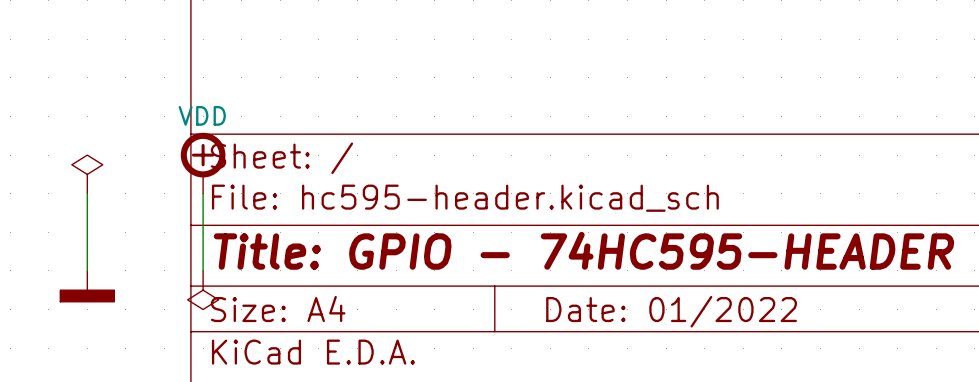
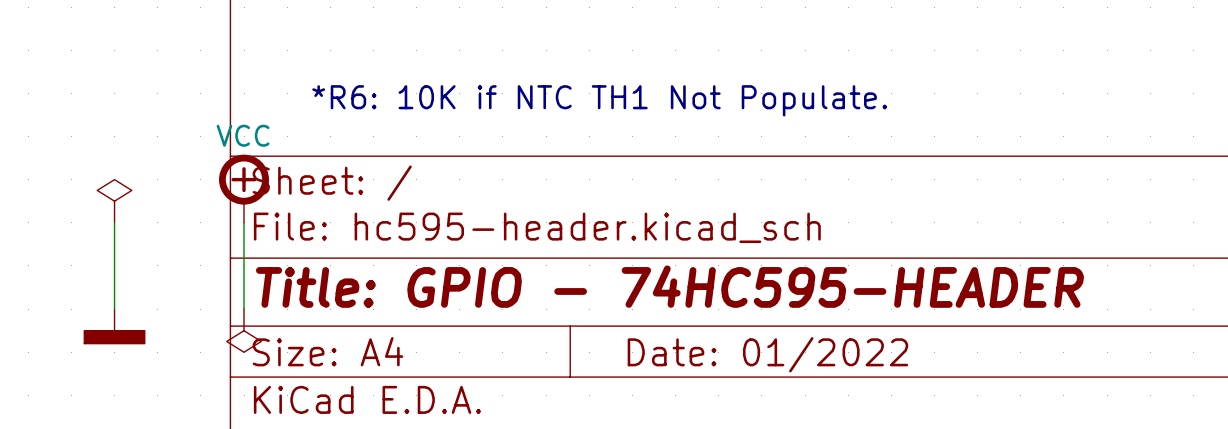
text: none -> *R6: 10K if NTC TH1 Not Populate. (599, 100)
power symbol text: VDD (202, 115) -> VCC (243, 135)

